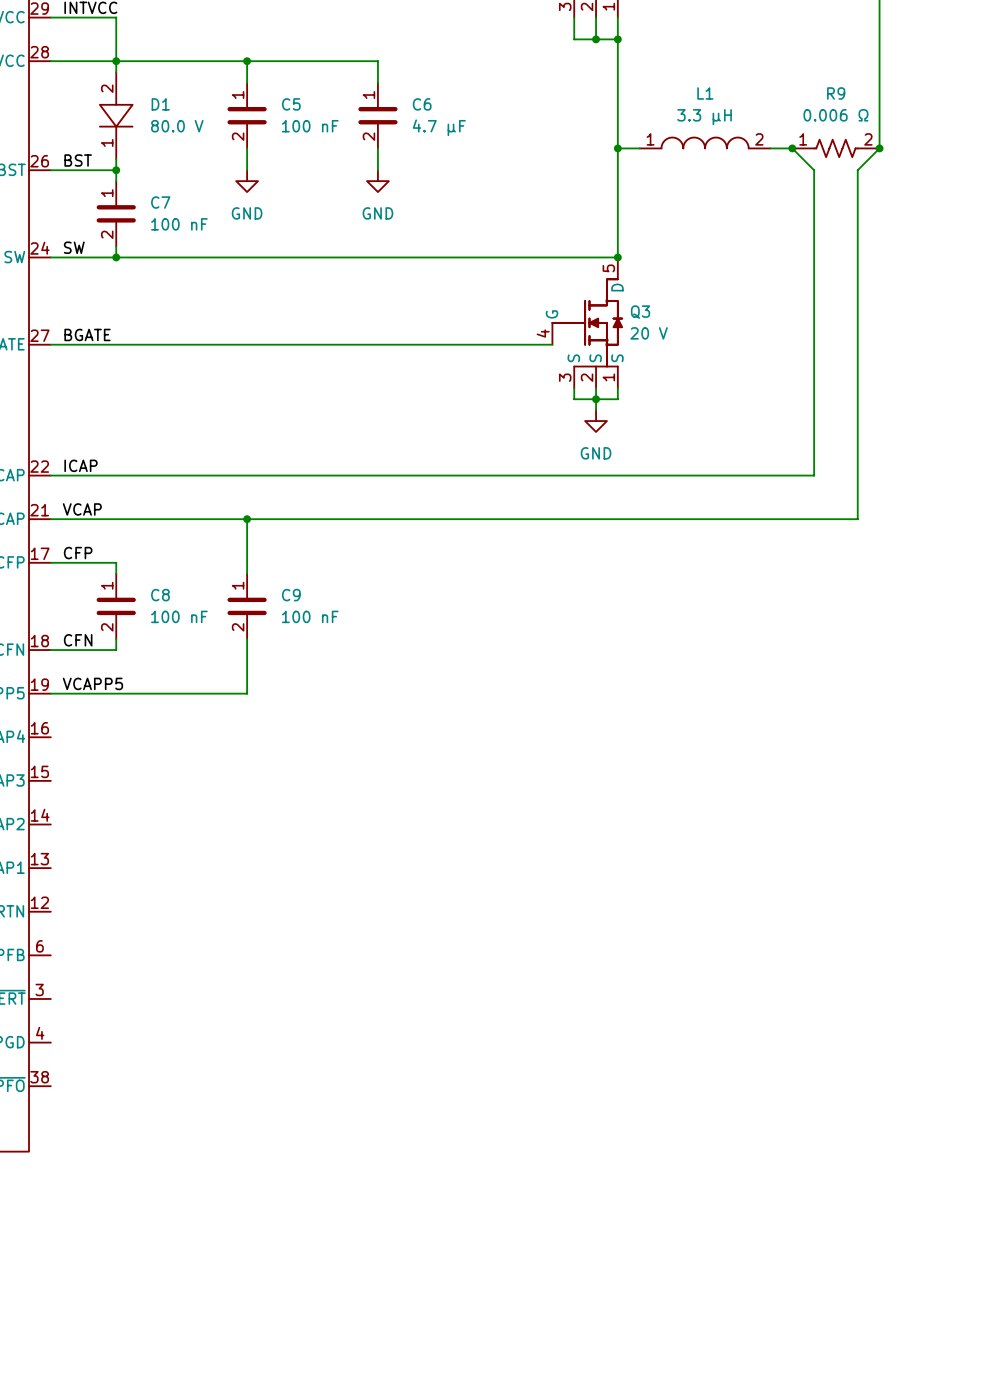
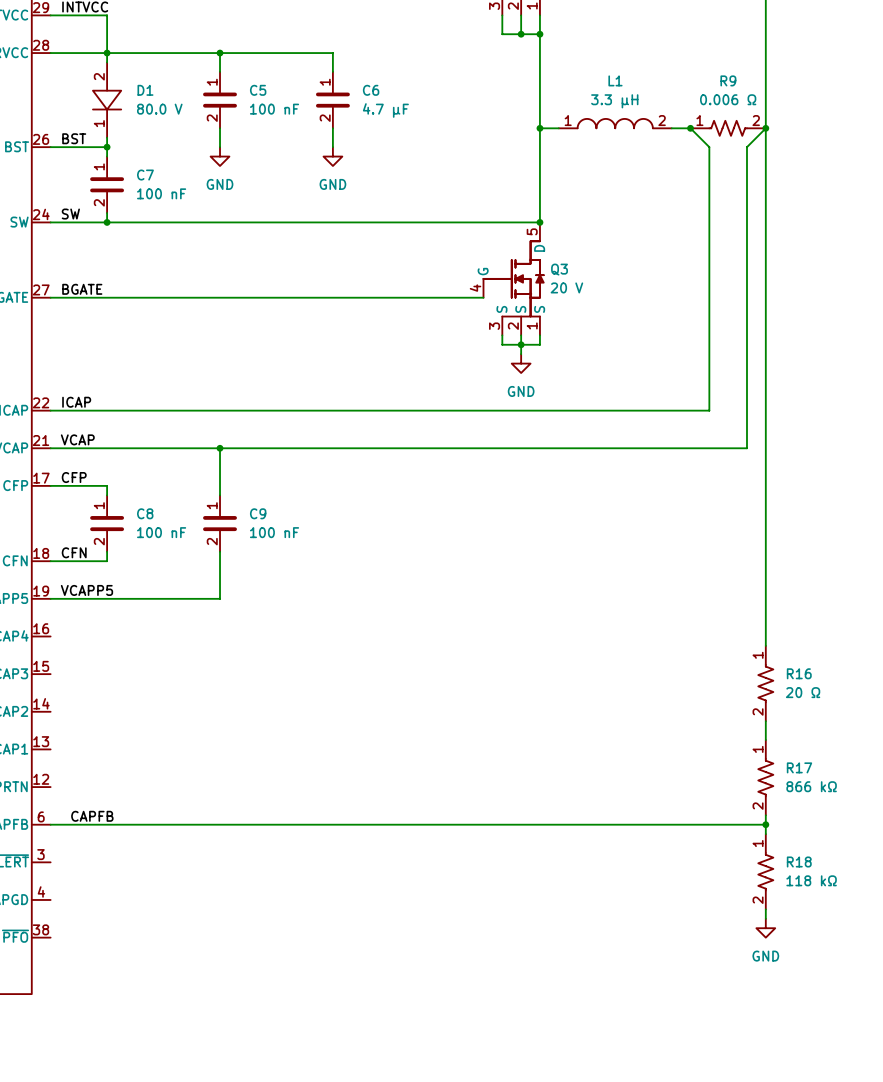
wire: none -> (765, 128) (765, 645)
R16: none -> 20 Ω (765, 683)
wire: none -> (765, 721) (765, 740)
R17: none -> 866 kΩ (765, 777)
wire: none -> (765, 815) (765, 834)
label: none -> CAPFB (92, 816)
wire: none -> (50, 824) (765, 824)
junction: none -> (765, 824)
R18: none -> 118 kΩ (765, 871)
wire: none -> (765, 909) (765, 918)
power symbol: none -> GND (765, 928)

